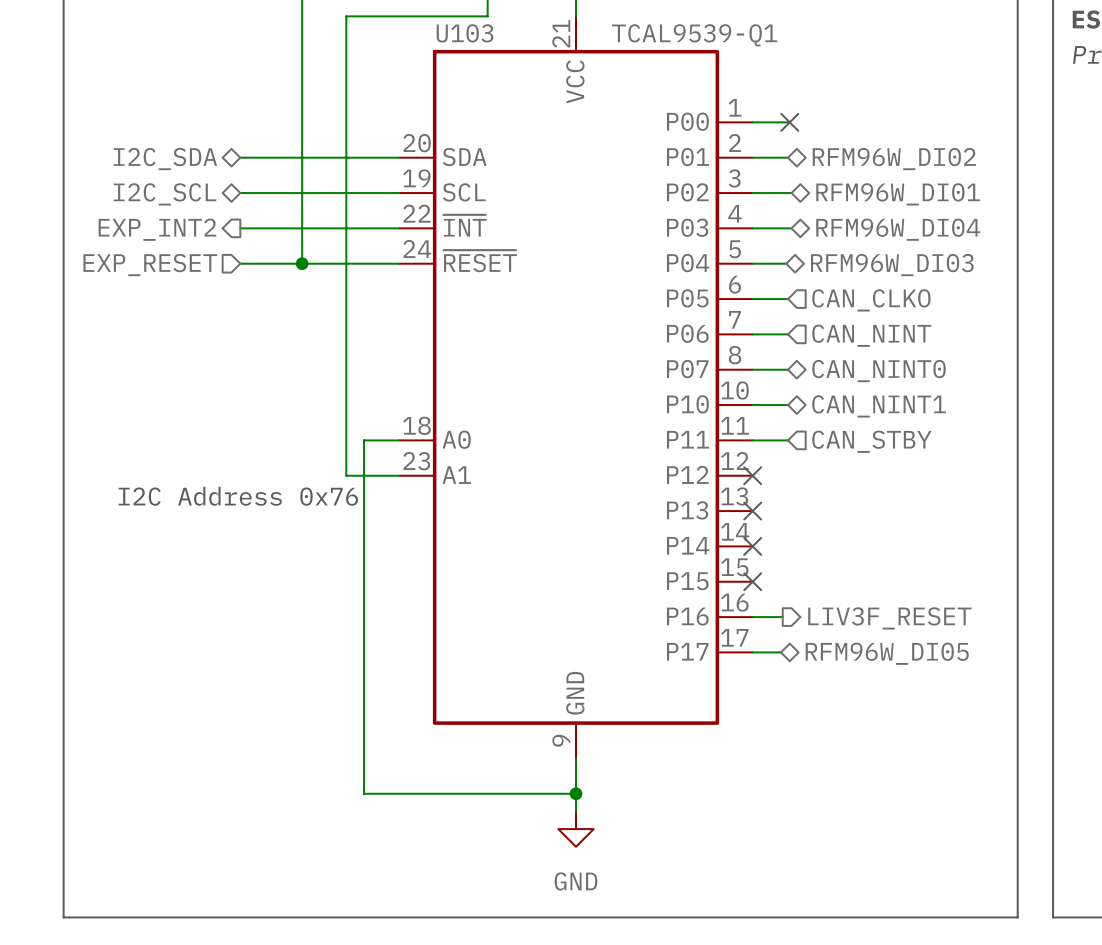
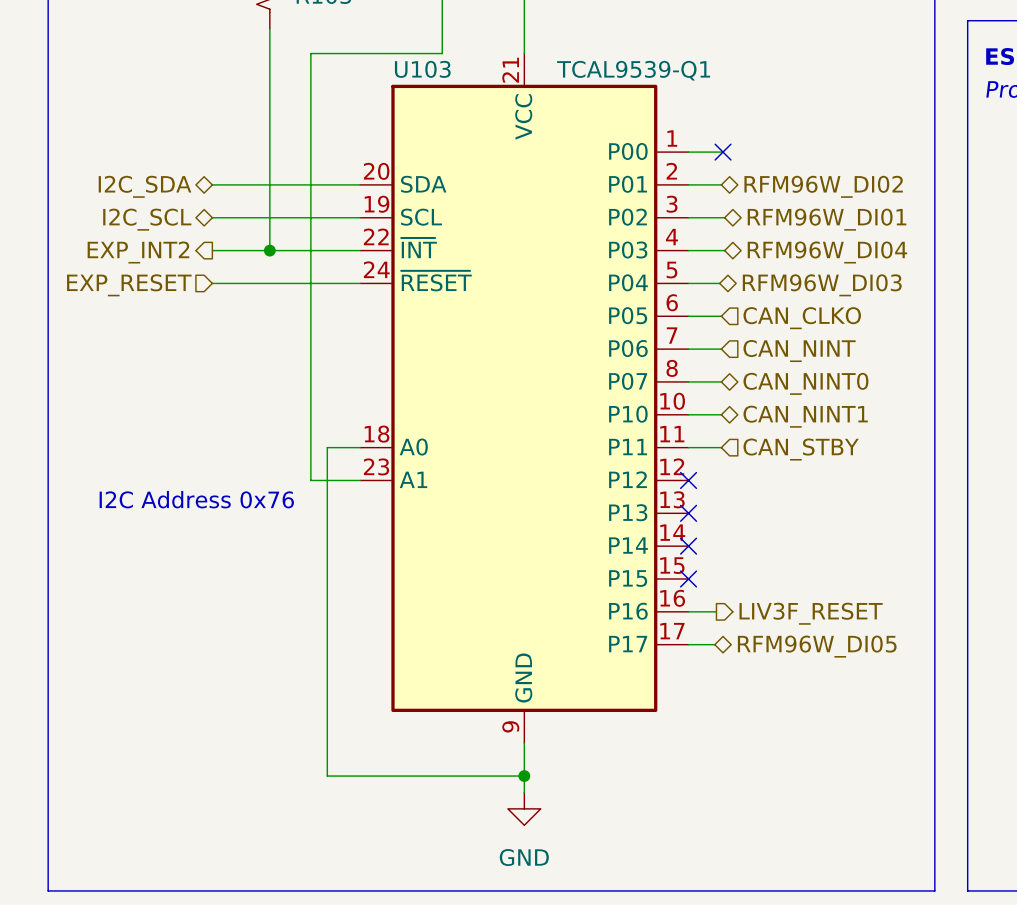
wire: (302, 228) (302, 263) -> none
junction position: (302, 263) -> (269, 250)

